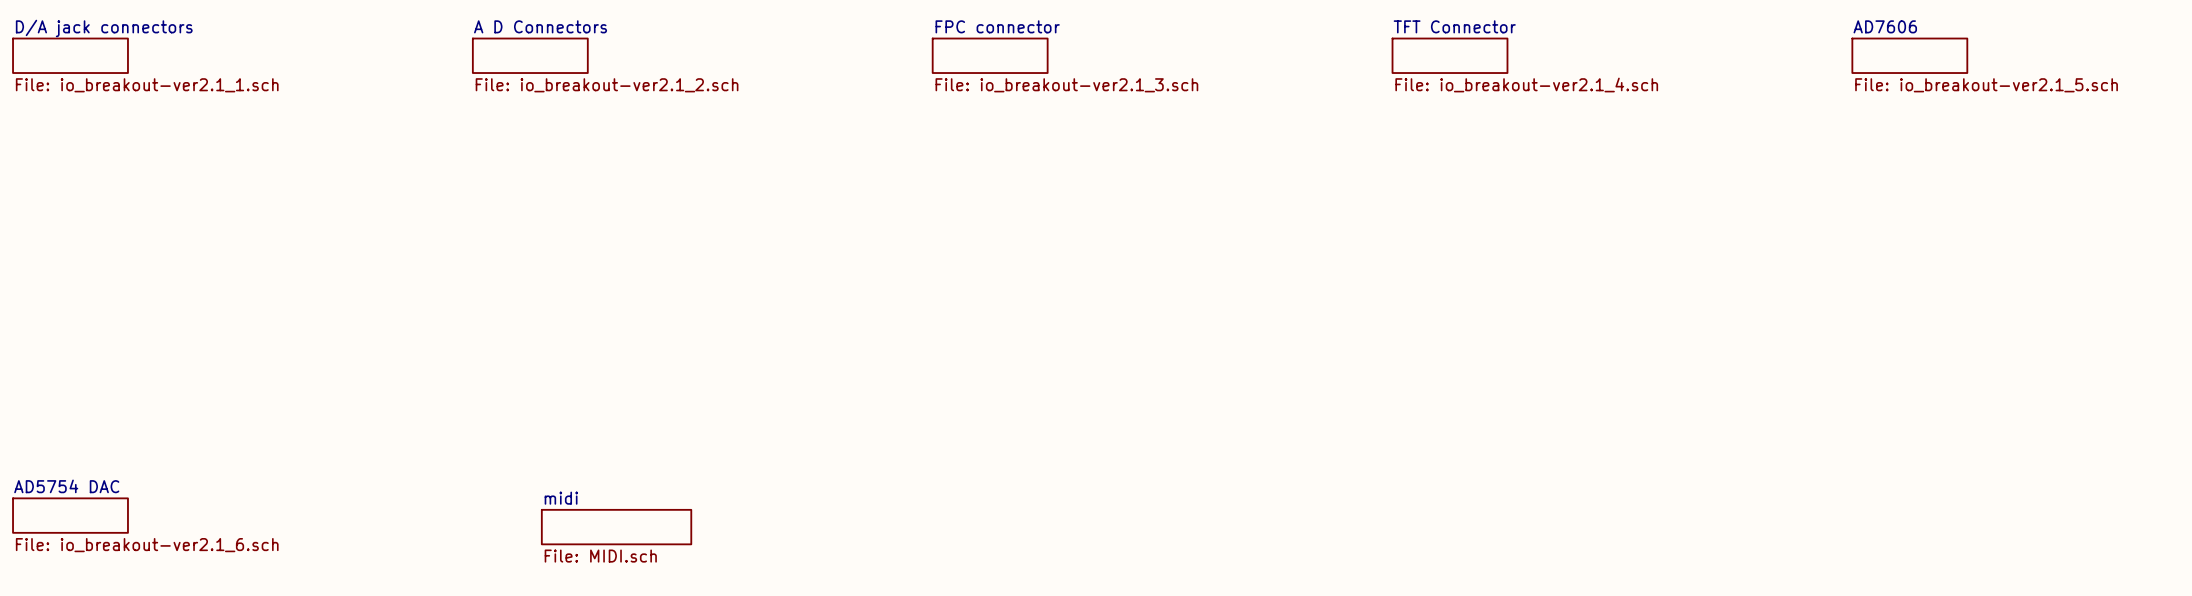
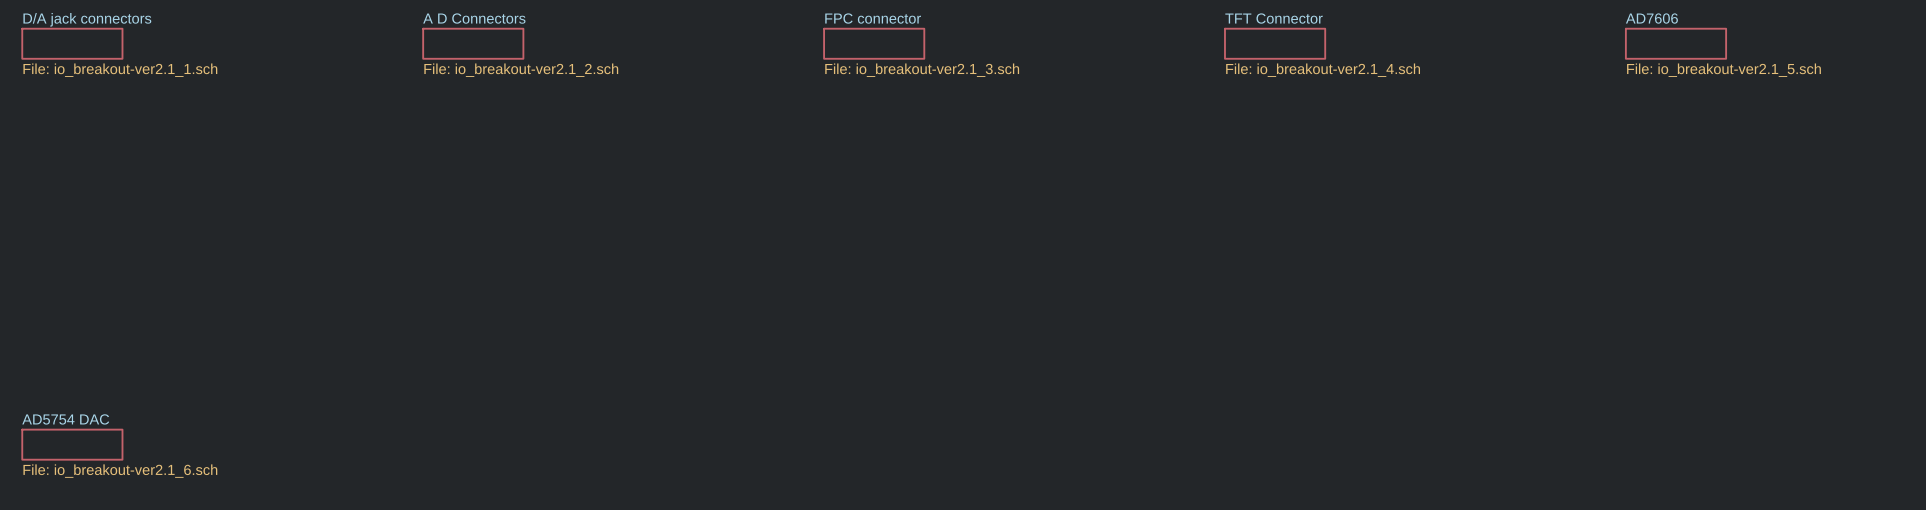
sheet midi: File: MIDI.sch (616, 527) -> none

